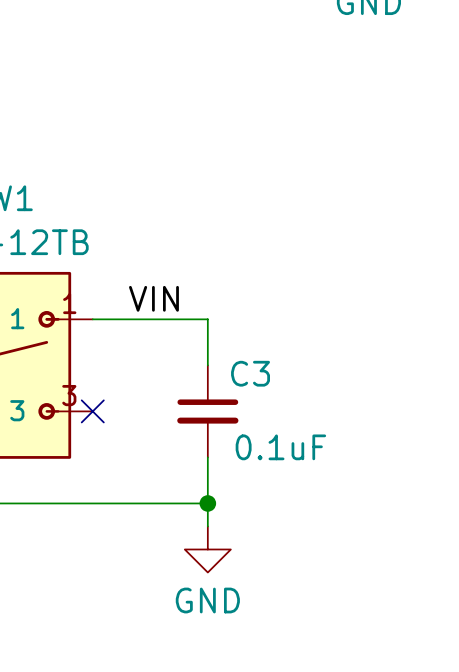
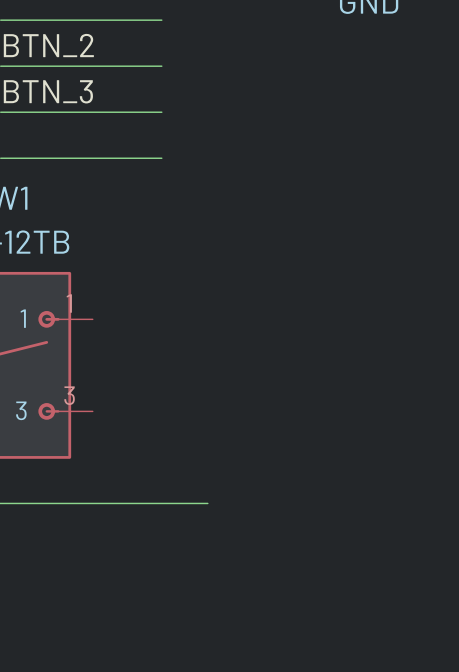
wire: none -> (0, 20) (161, 20)
label: none -> BTN_2 (48, 45)
wire: none -> (0, 66) (161, 66)
label: none -> BTN_3 (48, 91)
wire: none -> (0, 112) (161, 112)
wire: none -> (0, 158) (161, 158)
label: VIN (153, 298) -> none
wire: (92, 319) (207, 319) (207, 365) -> none
no-connect mark: (92, 411) -> none
C3: 0.1uF (207, 411) -> none
wire: (207, 457) (207, 526) -> none
junction: (207, 503) -> none
power symbol: GND (207, 549) -> none

